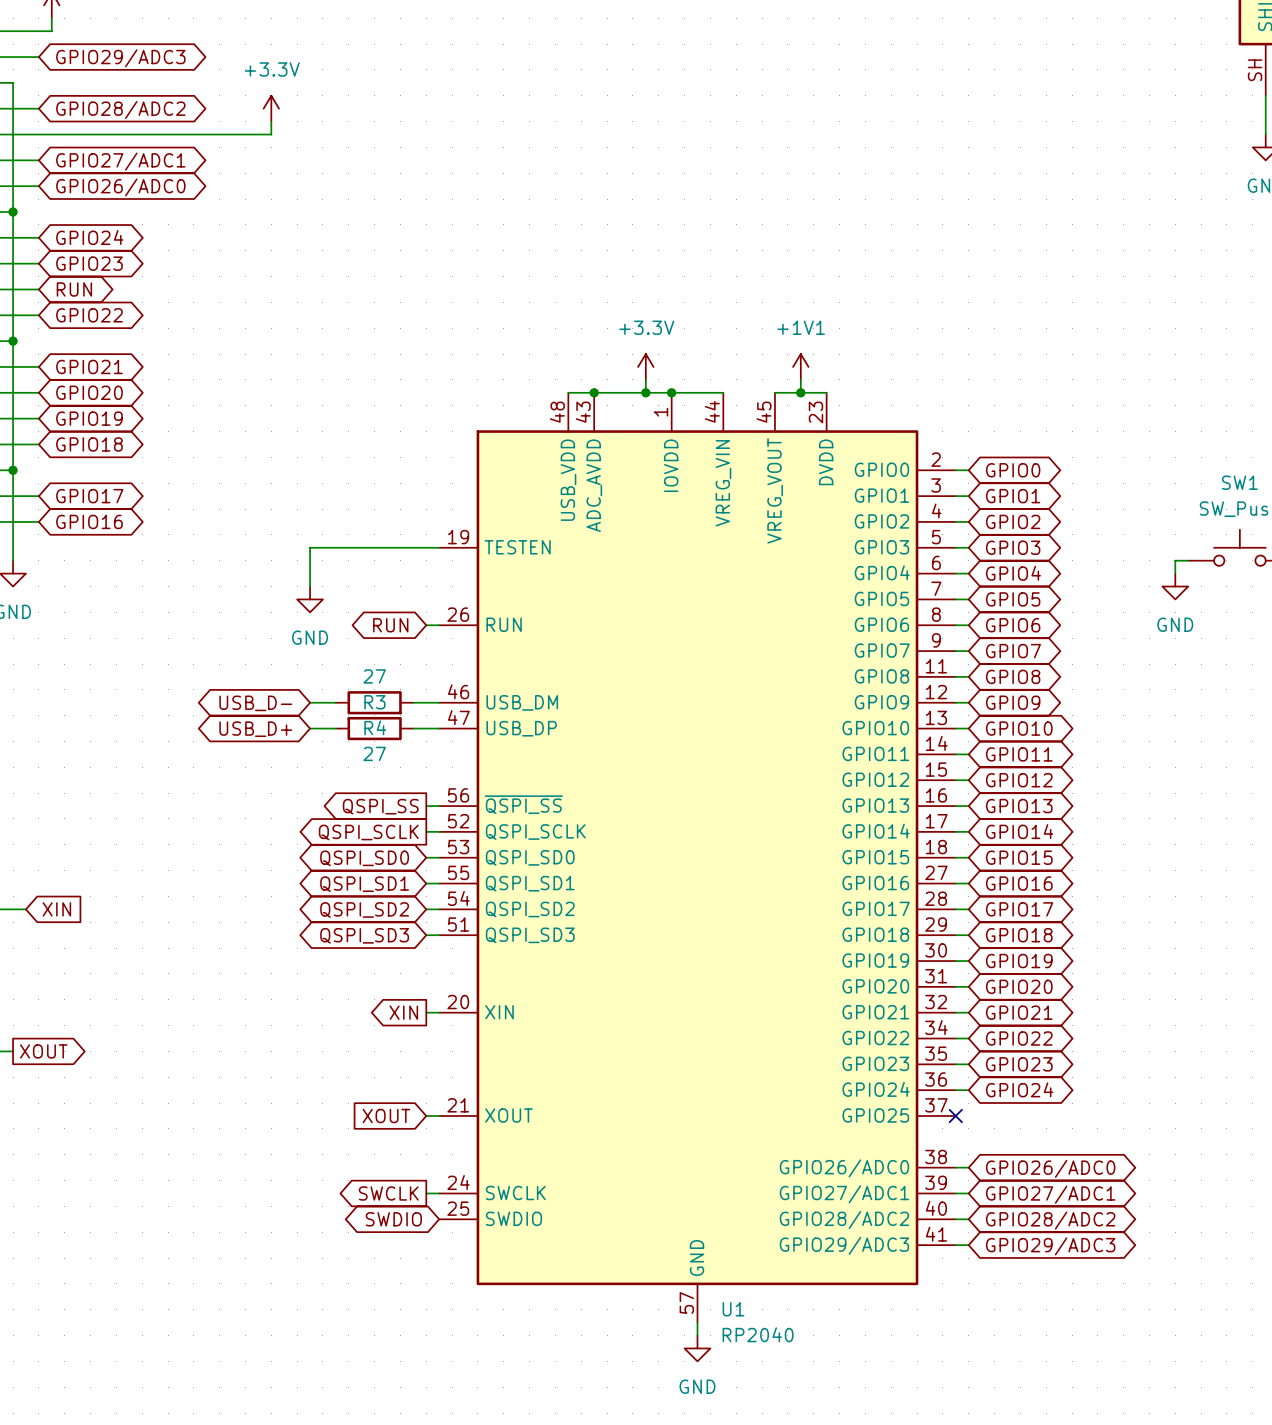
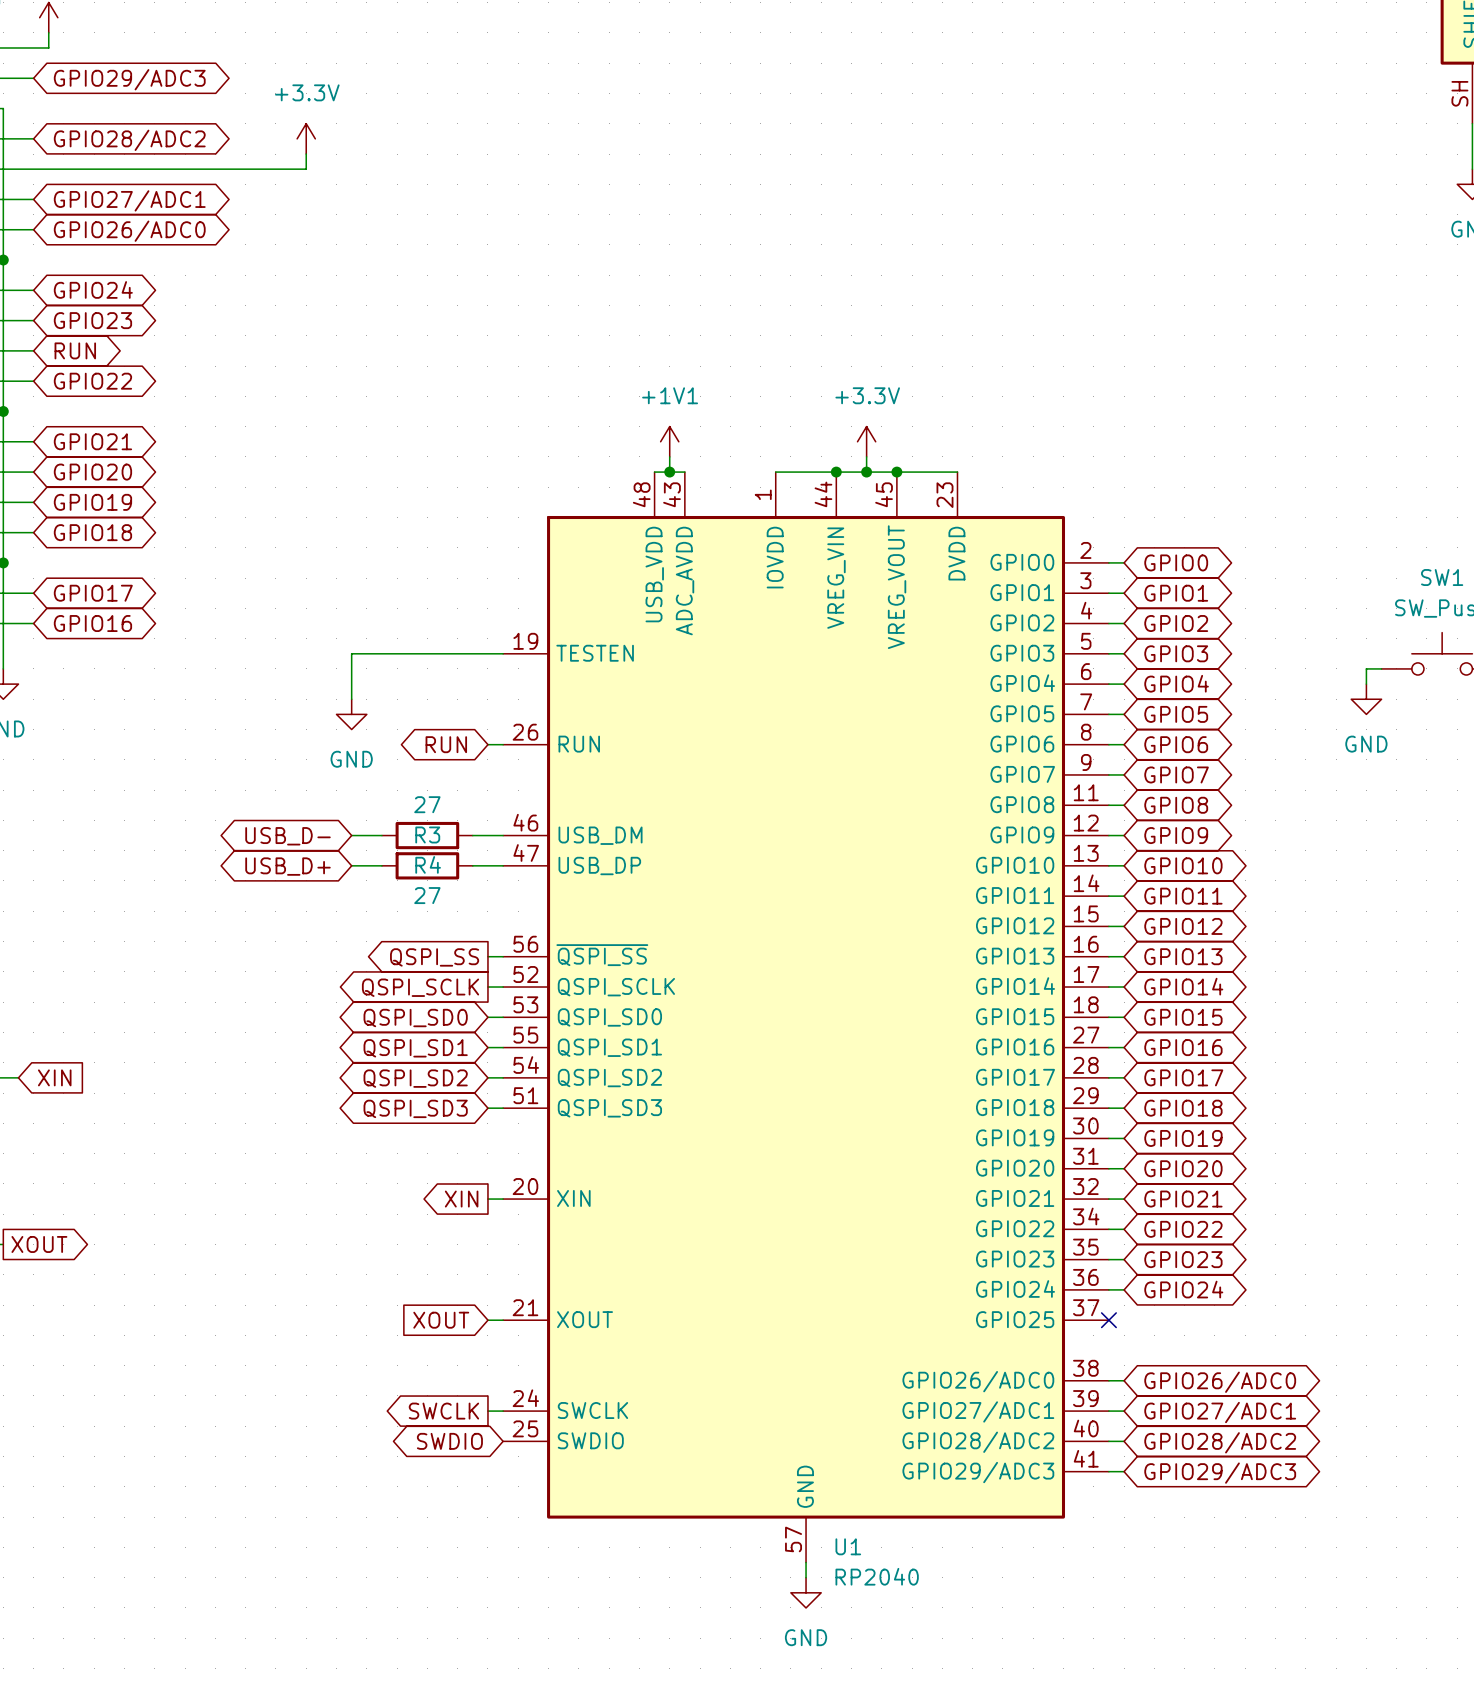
power symbol position: +3.3V (645, 366) -> +3.3V (866, 441)
power symbol position: +1V1 (800, 366) -> +1V1 (669, 441)
wire: (645, 379) (645, 392) -> (669, 456) (669, 472)
wire: (800, 379) (800, 392) -> (866, 456) (866, 472)
wire: (594, 392) (671, 392) -> none
junction position: (594, 392) -> (669, 472)
junction: (645, 392) -> none
junction: (671, 392) -> none
wire: none -> (836, 472) (896, 472)
junction: none -> (836, 472)
junction: none -> (866, 472)
junction: none -> (896, 472)
junction: (800, 392) -> none

